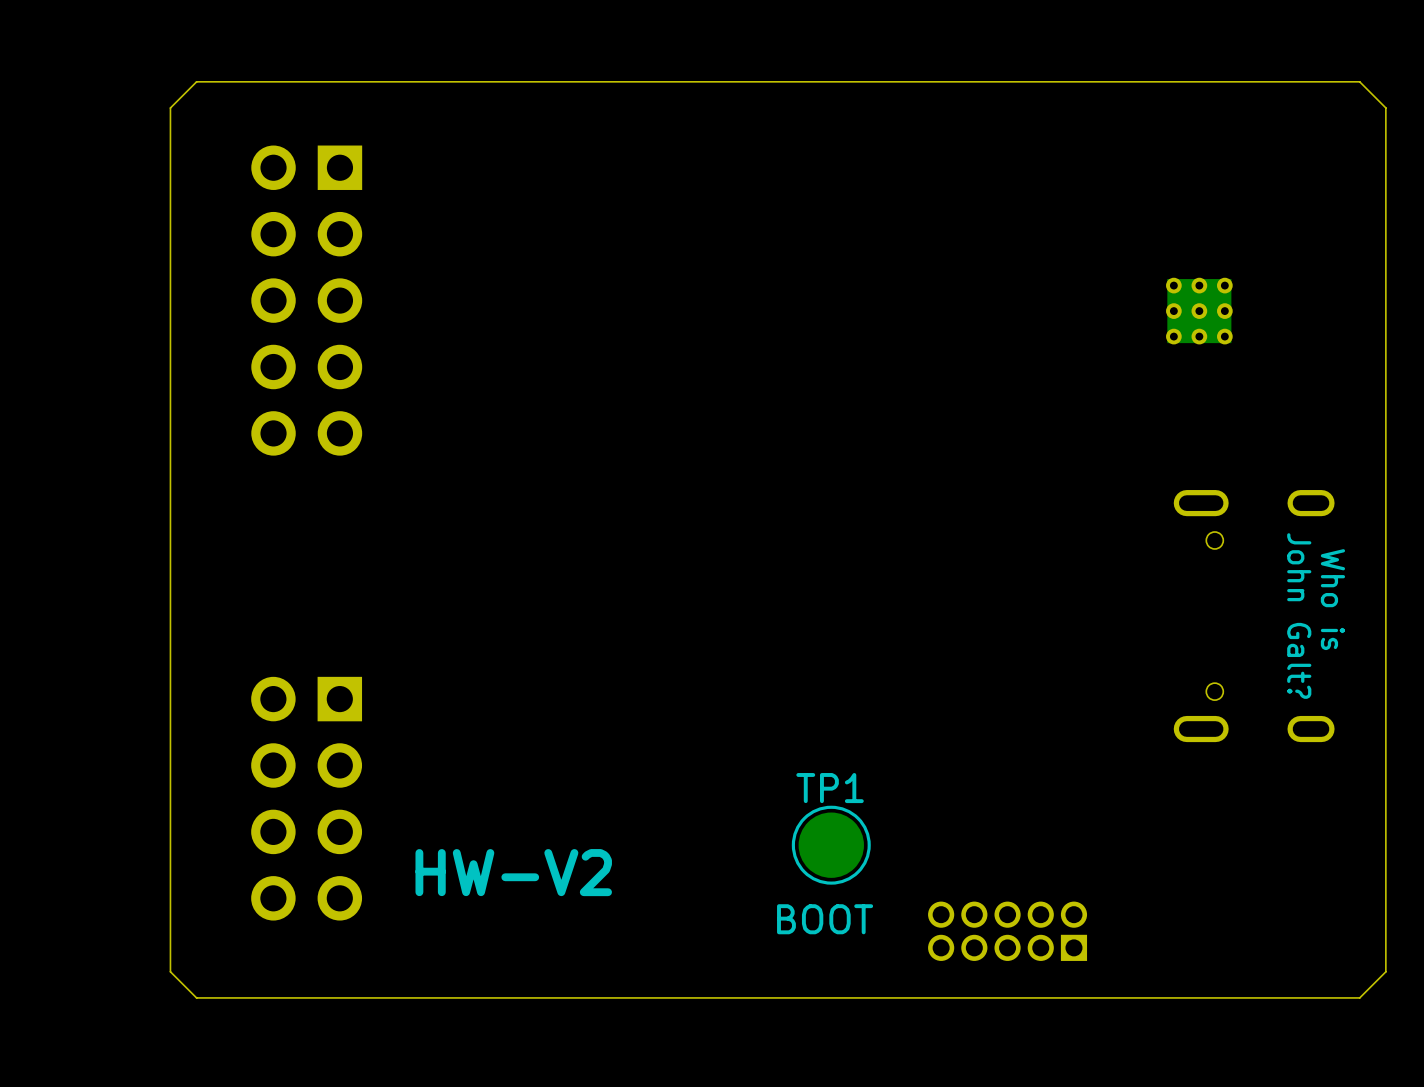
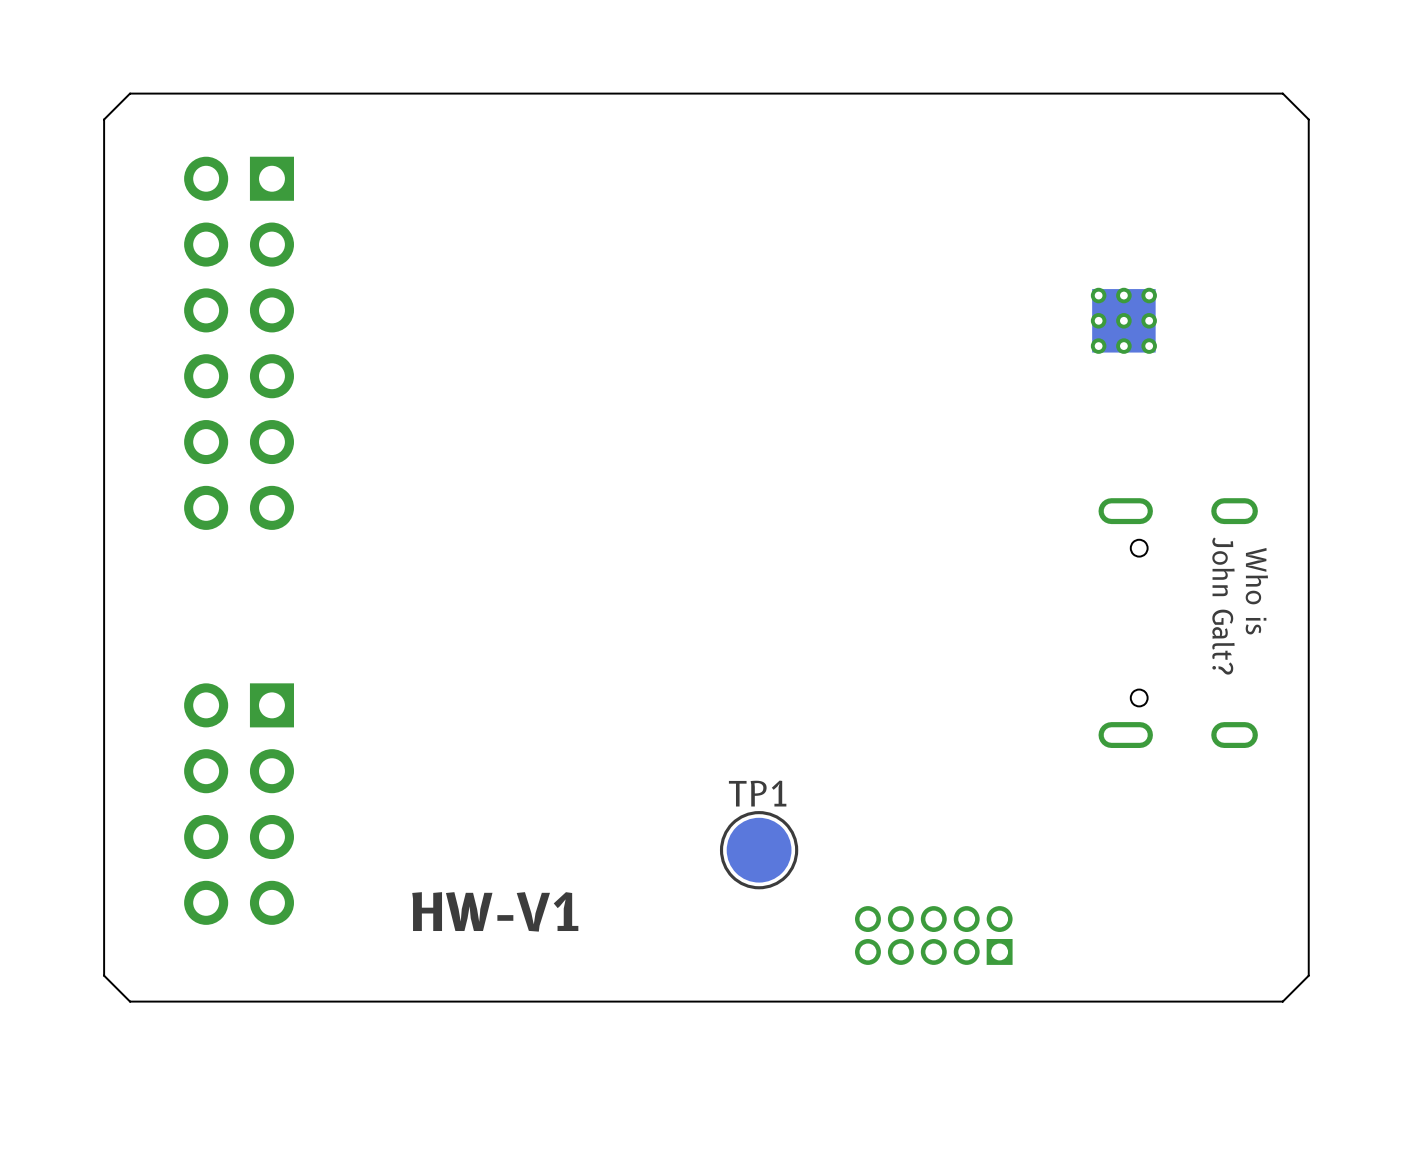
part: none -> (239, 343)
text: HW-V2 (513, 872) -> HW-V1 (495, 911)
text: BOOT (825, 919) -> none

